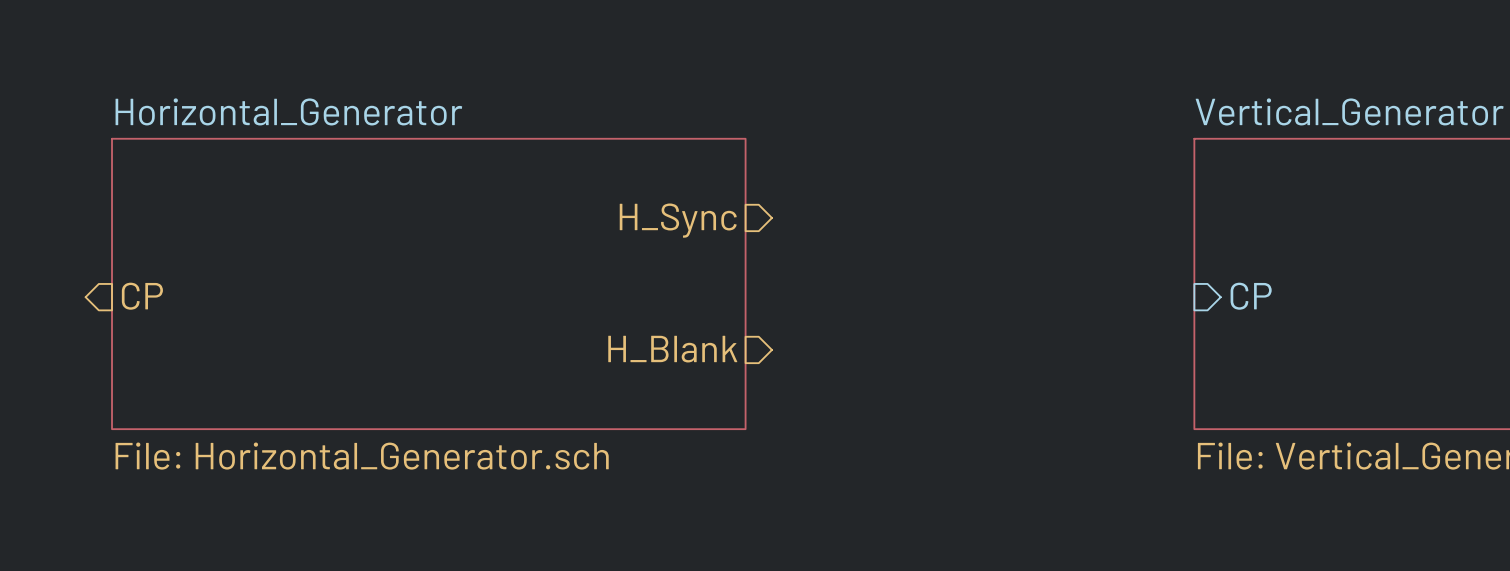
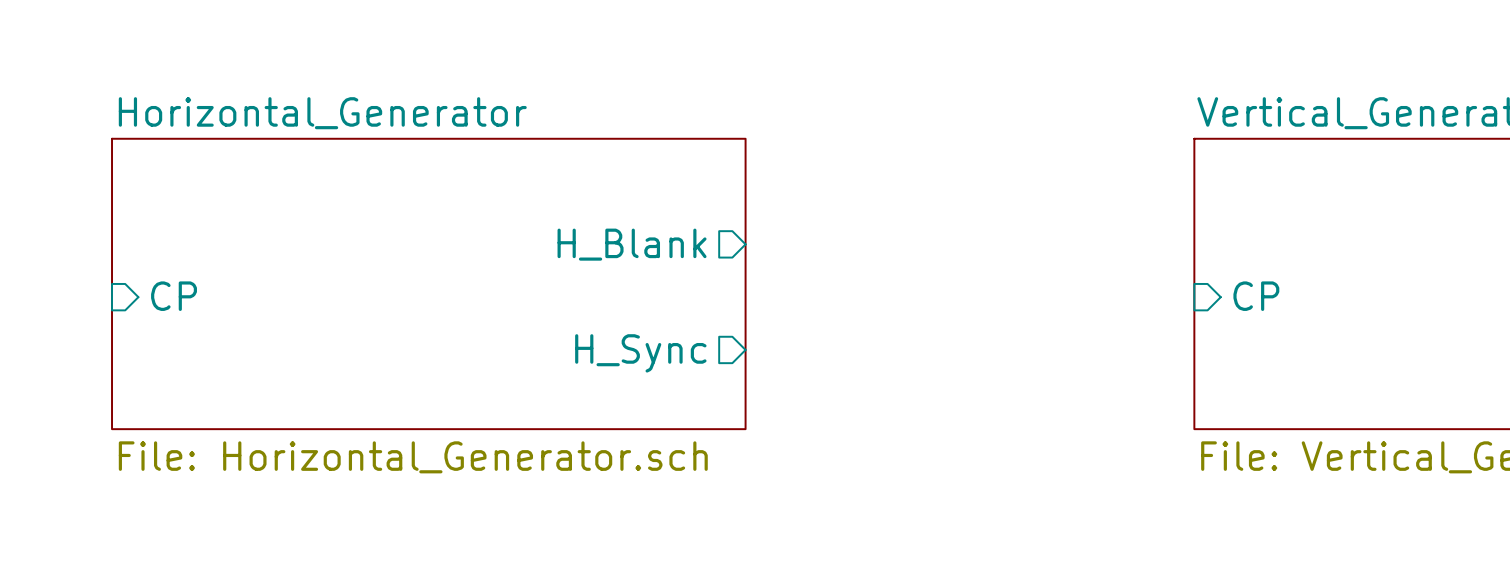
hierarchical label: H_Sync (678, 220) -> none
sheet pin: none -> H_Blank (632, 244)
hierarchical label: CP (142, 296) -> none
sheet pin: none -> CP (174, 296)
hierarchical label: H_Blank (672, 349) -> none
sheet pin: none -> H_Sync (640, 353)

